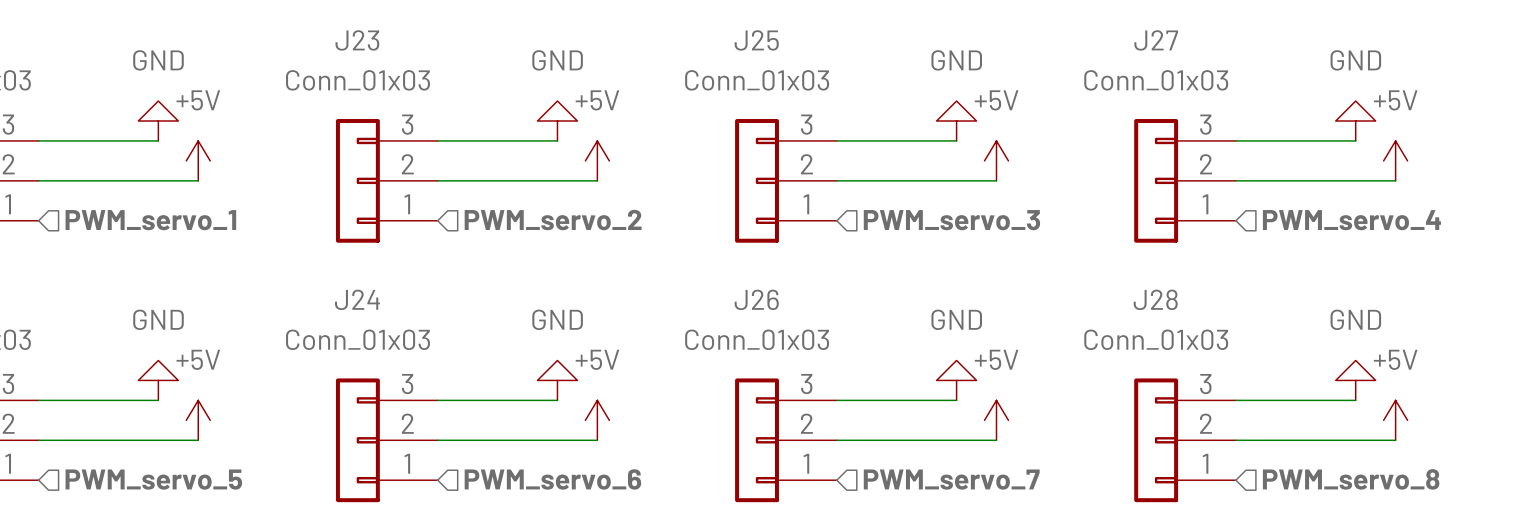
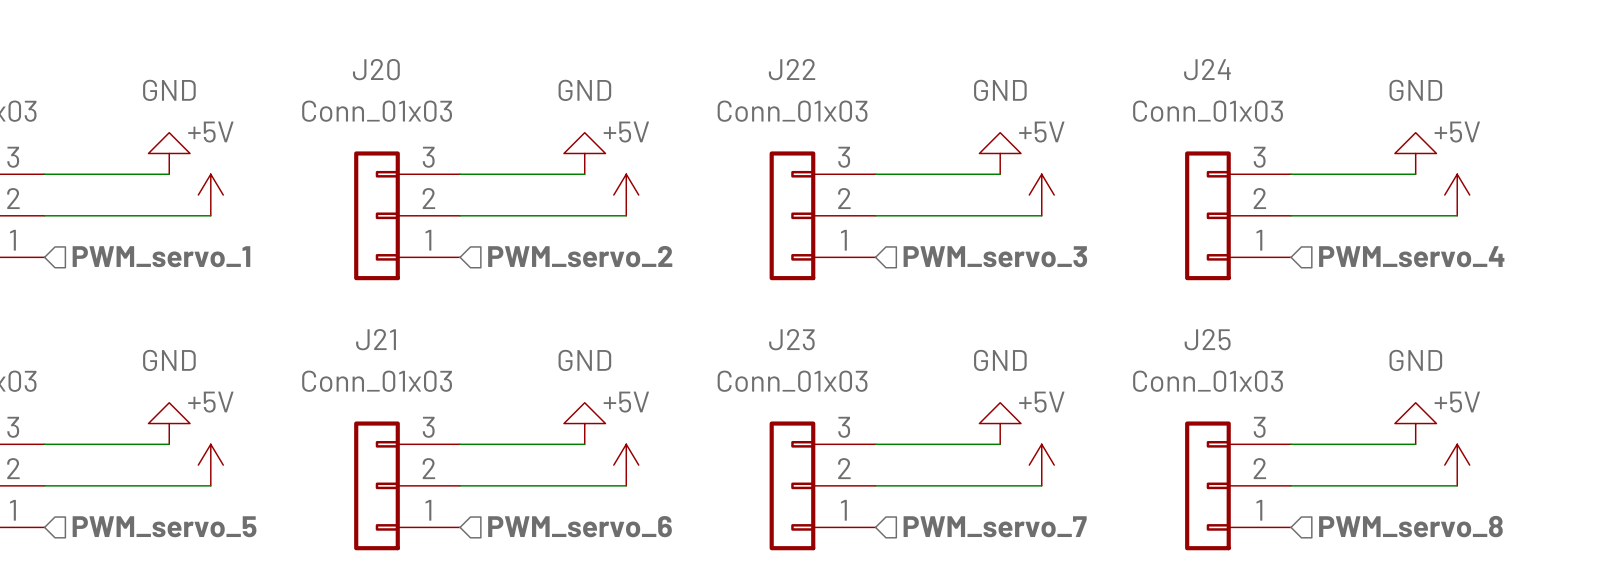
J23 name: J23 (357, 40) -> J20 (376, 69)
J25 name: J25 (756, 40) -> J22 (792, 69)
J27 name: J27 (1156, 40) -> J24 (1207, 69)
J24 name: J24 (357, 299) -> J21 (376, 339)
J26 name: J26 (756, 299) -> J23 (791, 339)
J28 name: J28 (1155, 299) -> J25 (1207, 339)

